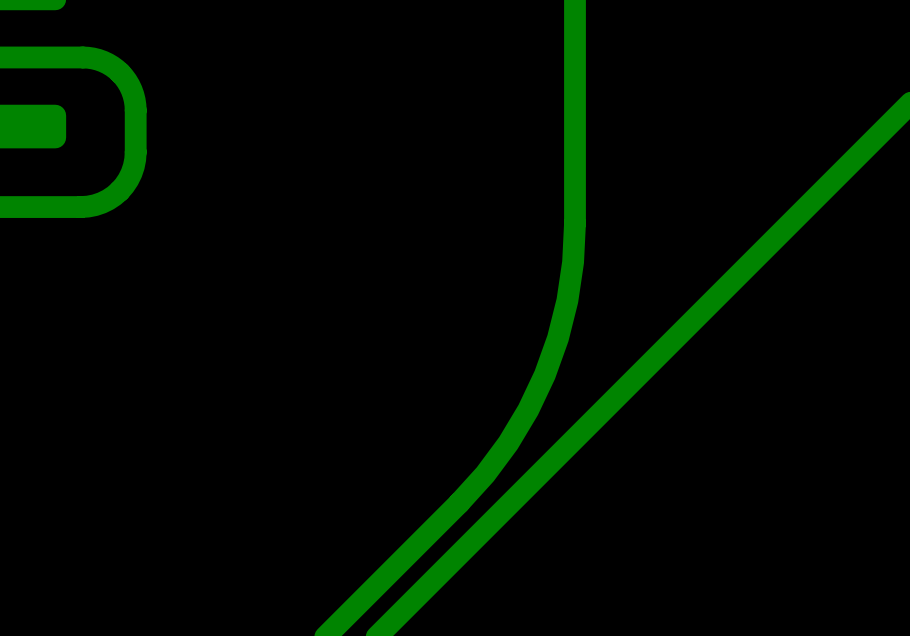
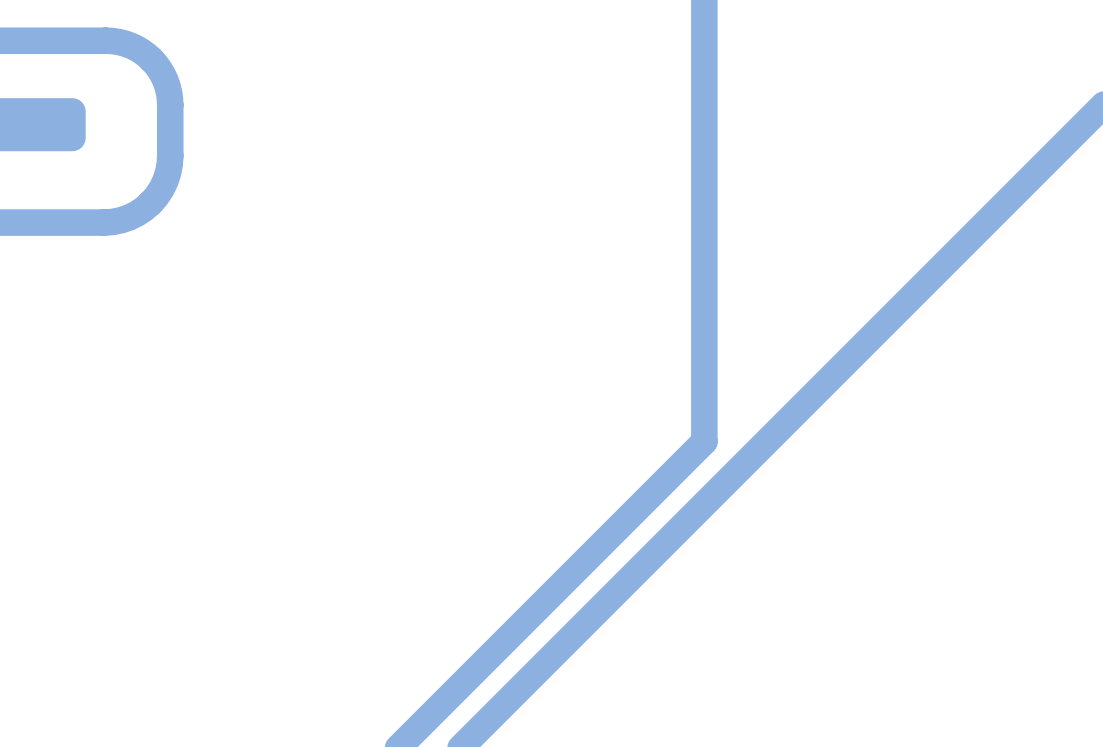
bottom track: (575, 223) (573, 262) (567, 300) (557, 338) (544, 374) (528, 409) (508, 443) (485, 474) (459, 503) -> (704, 242) (704, 441) (563, 582)

